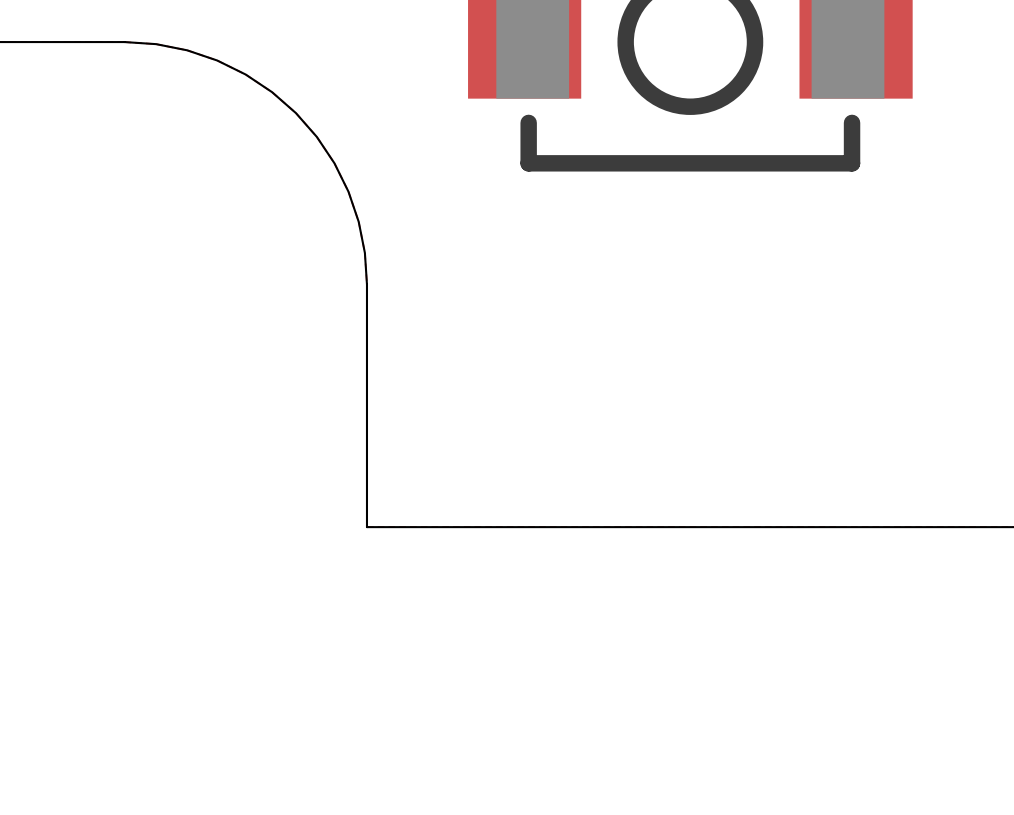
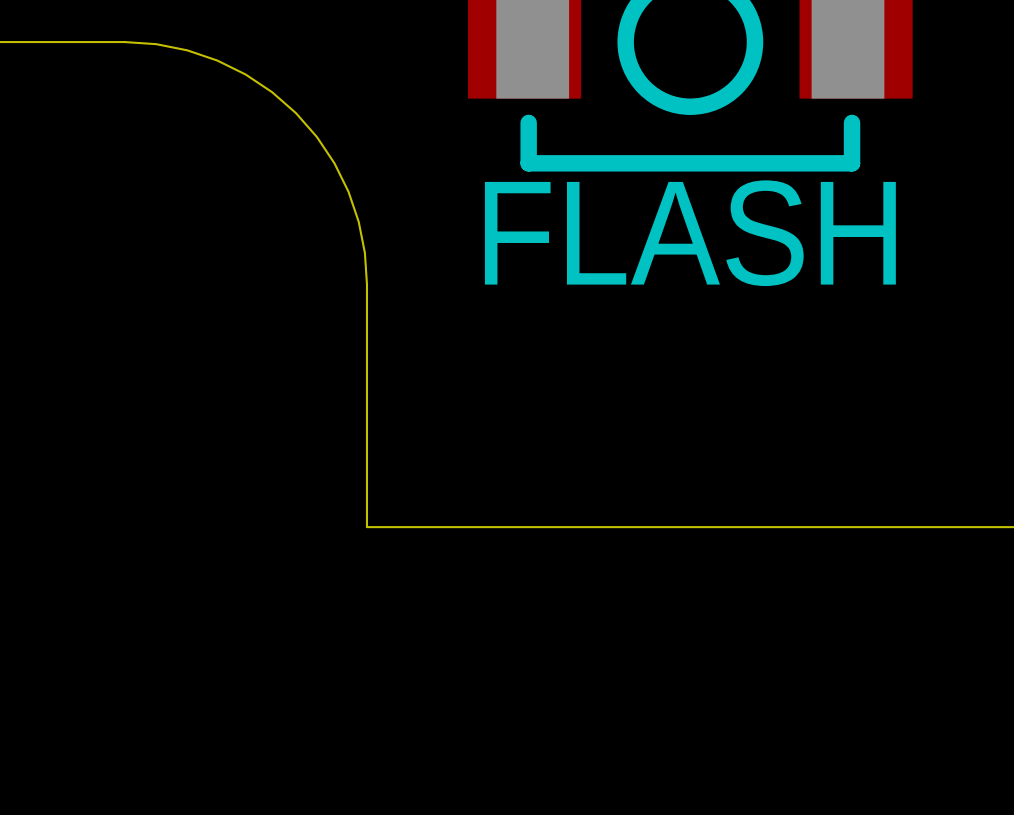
text: none -> FLASH (690, 233)

